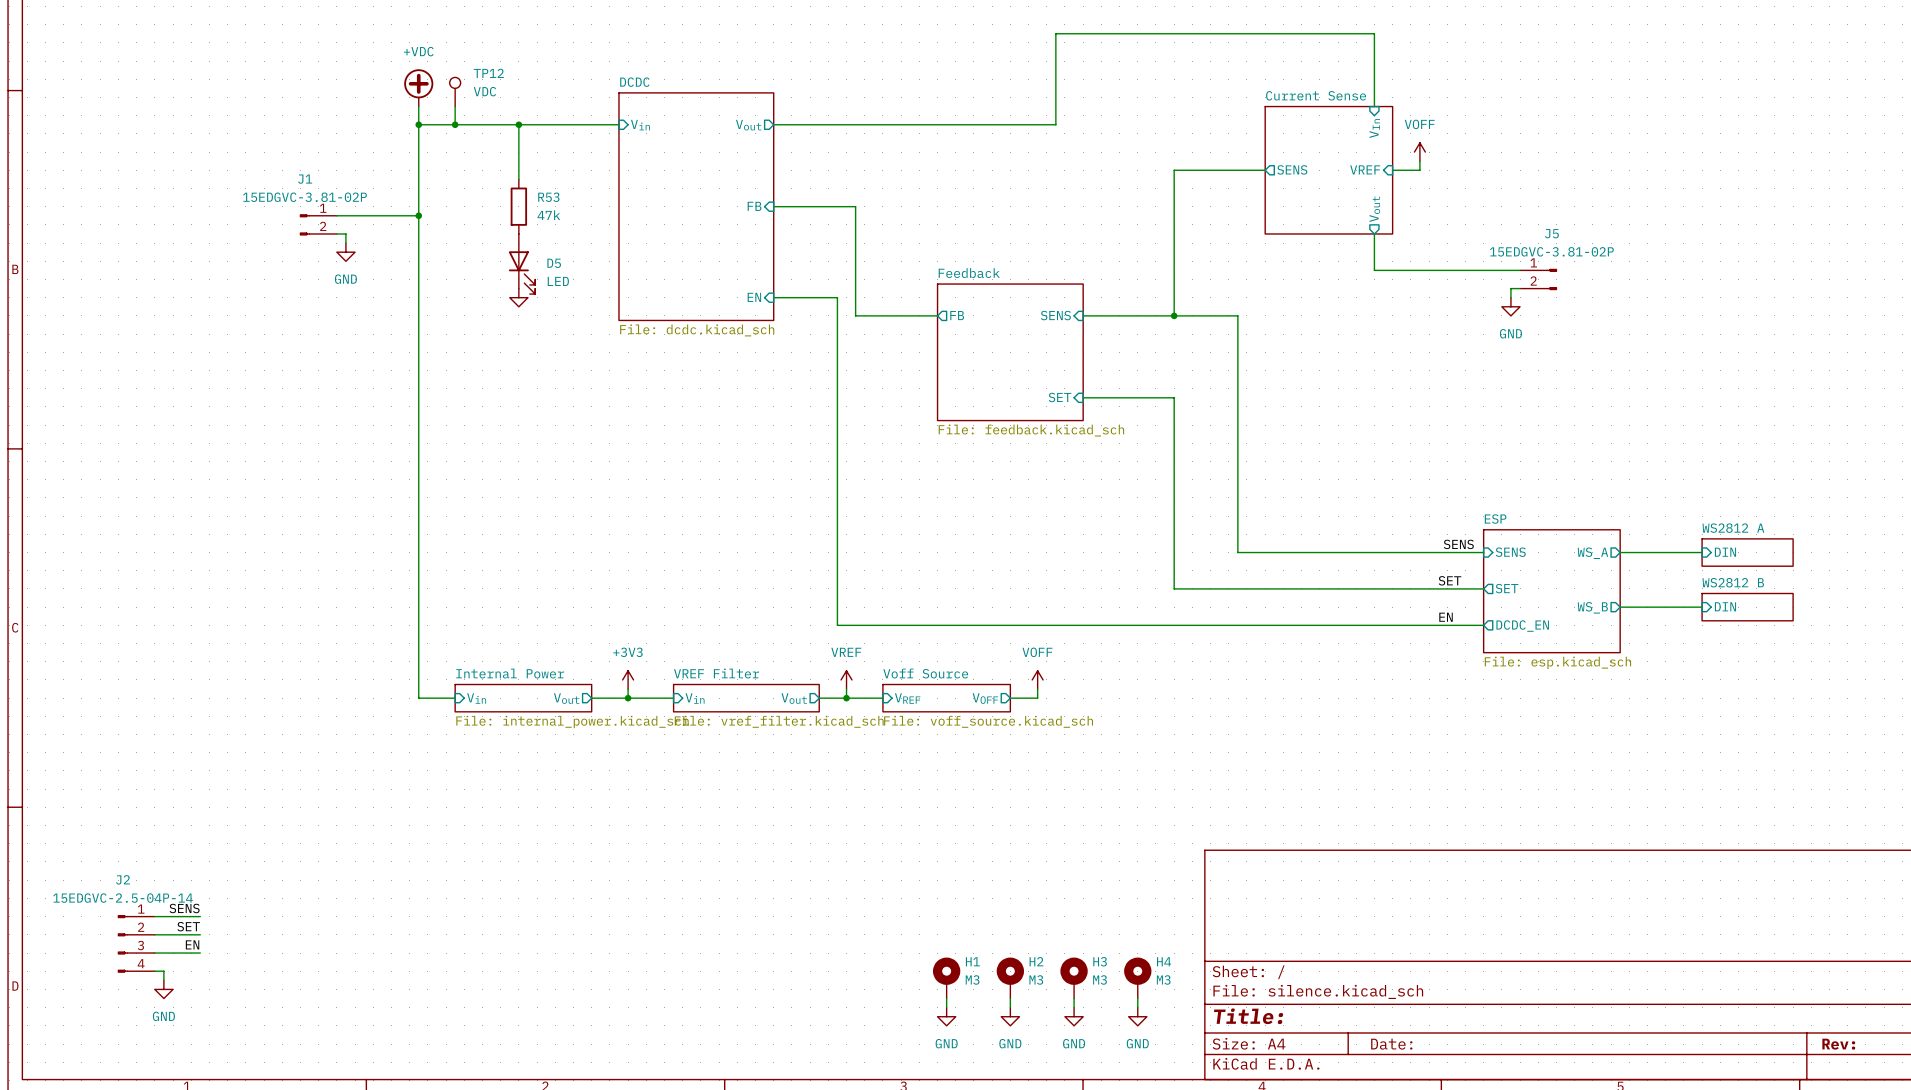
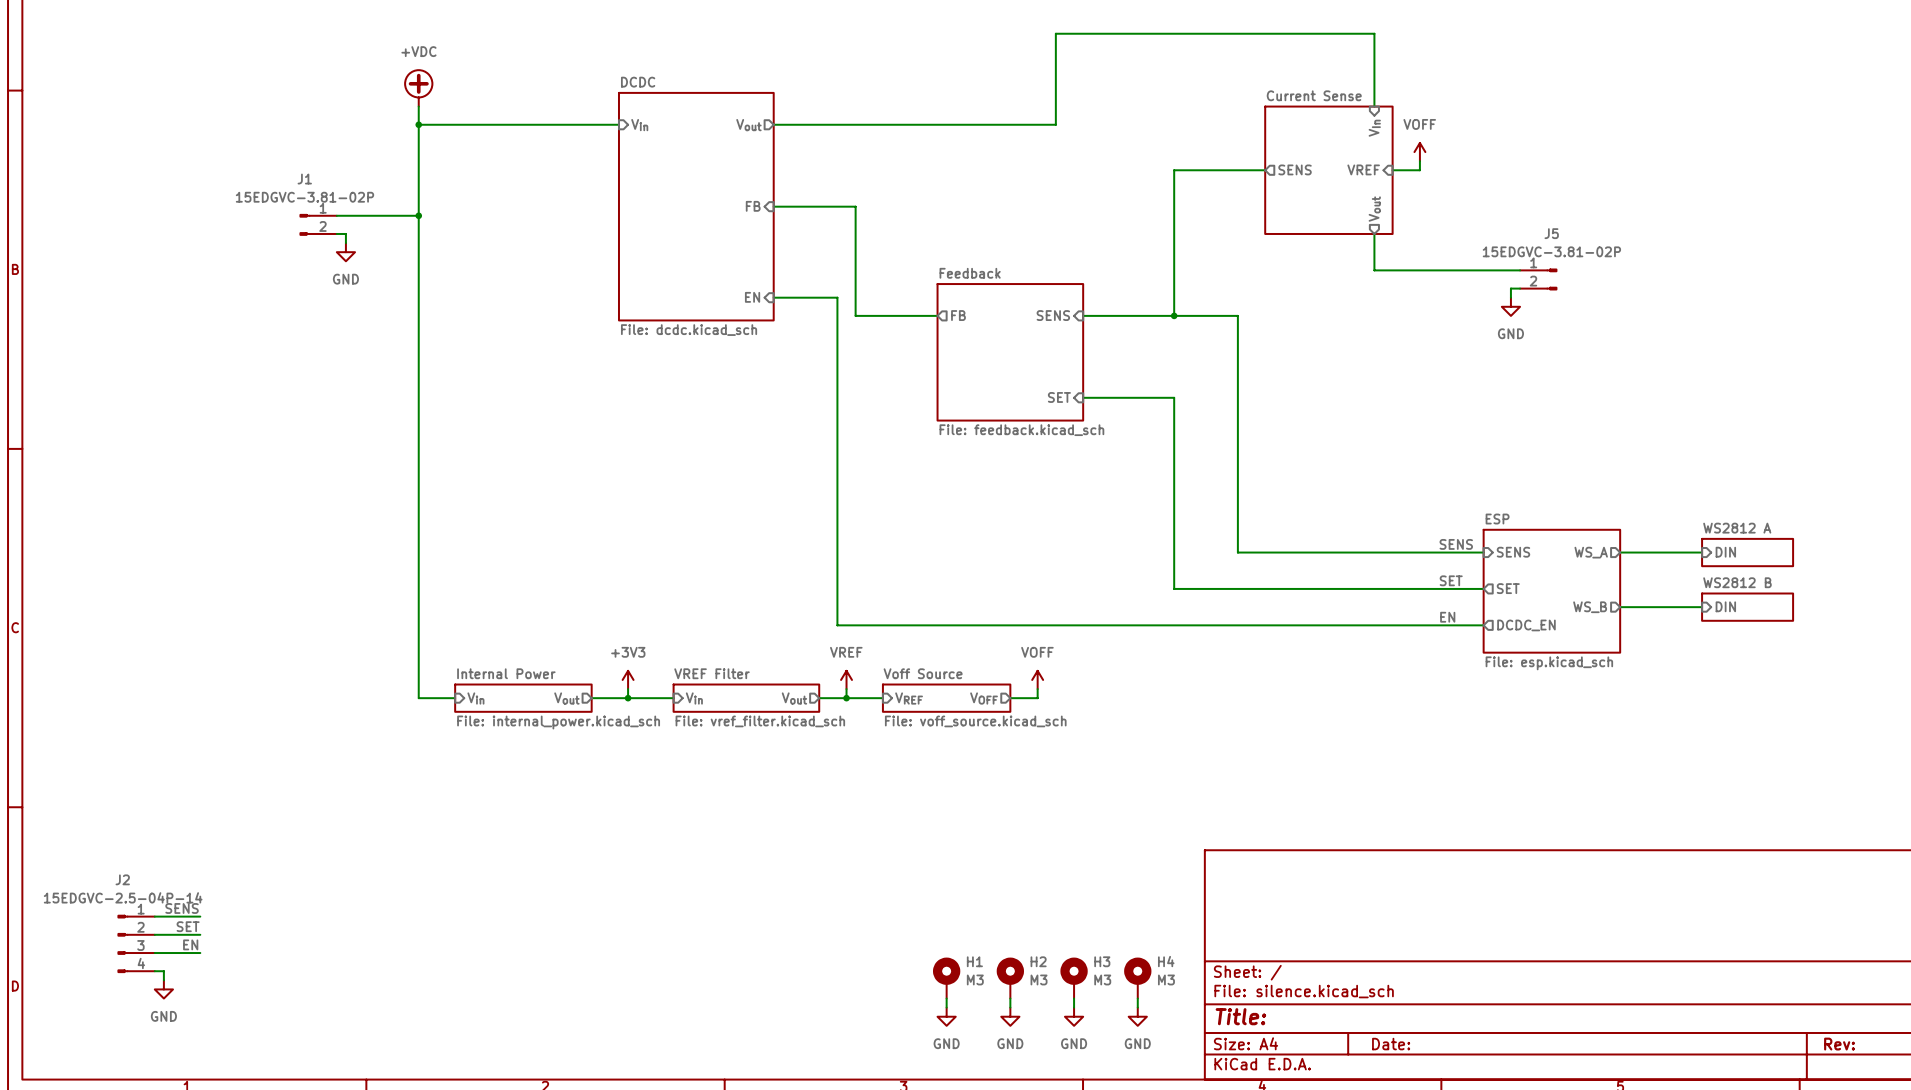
TP12: VDC (455, 92) -> none
wire: (455, 106) (455, 124) -> none
junction: (455, 124) -> none
wire: (518, 124) (518, 179) -> none
junction: (518, 124) -> none
R53: 47k (518, 206) -> none
D5: LED (522, 264) -> none
power symbol: (518, 297) -> none

